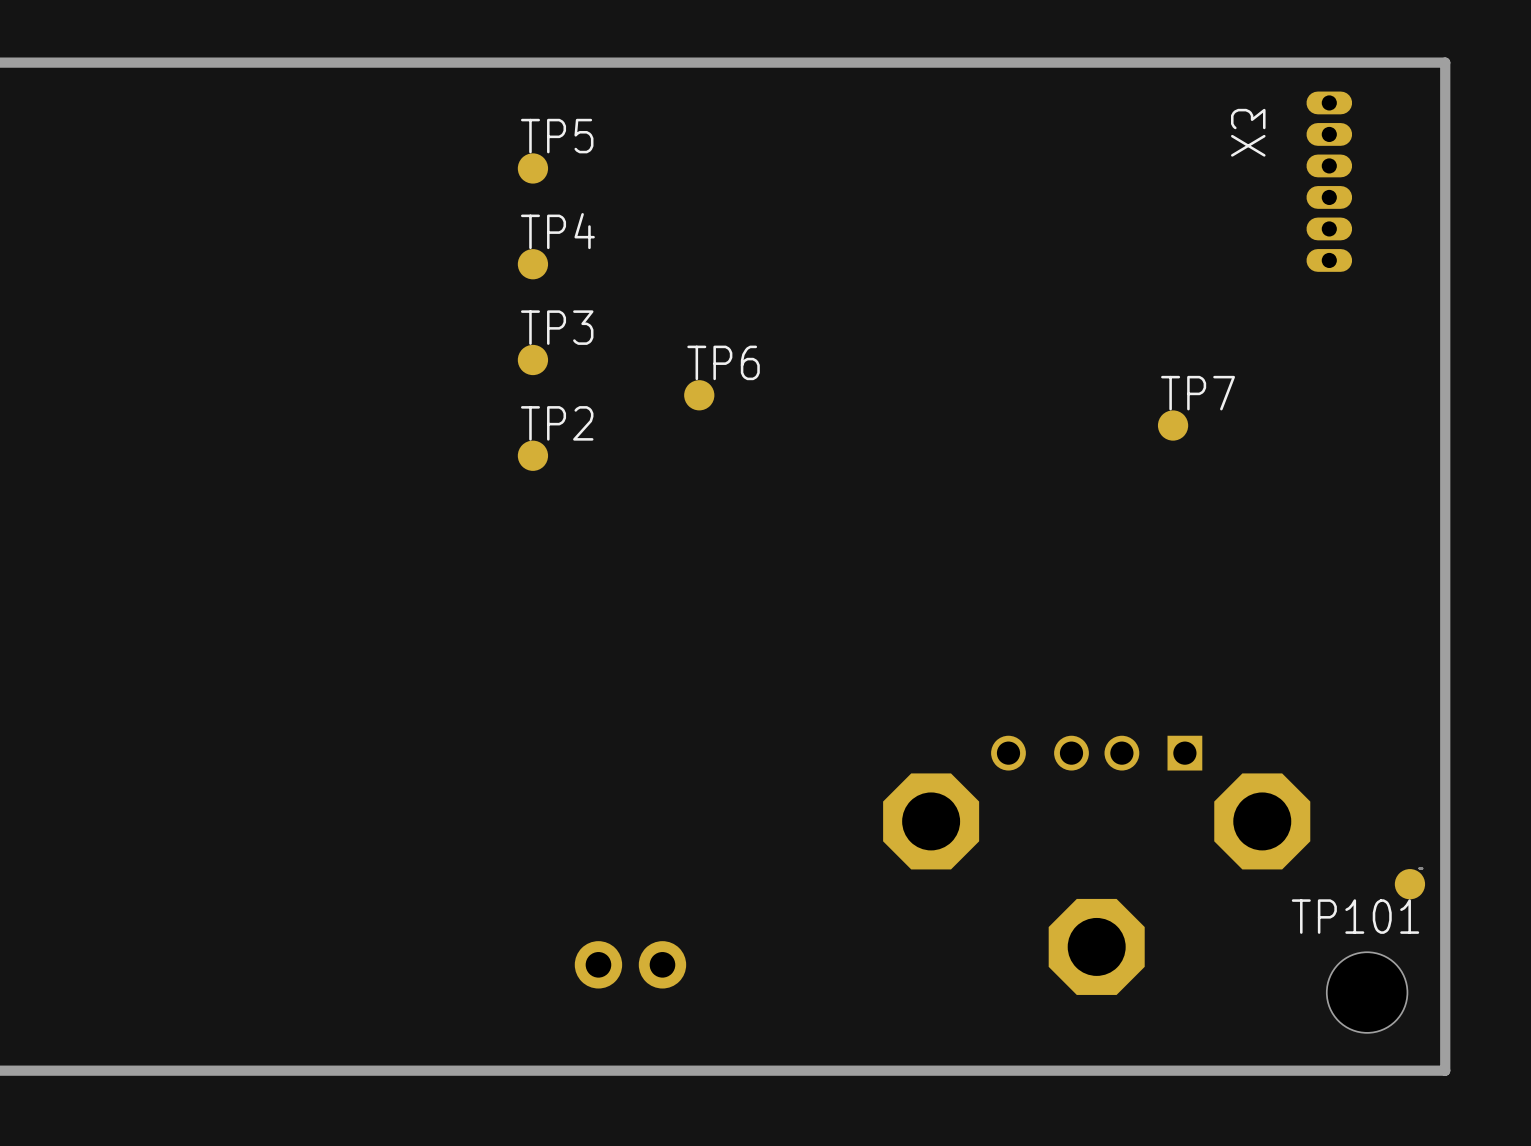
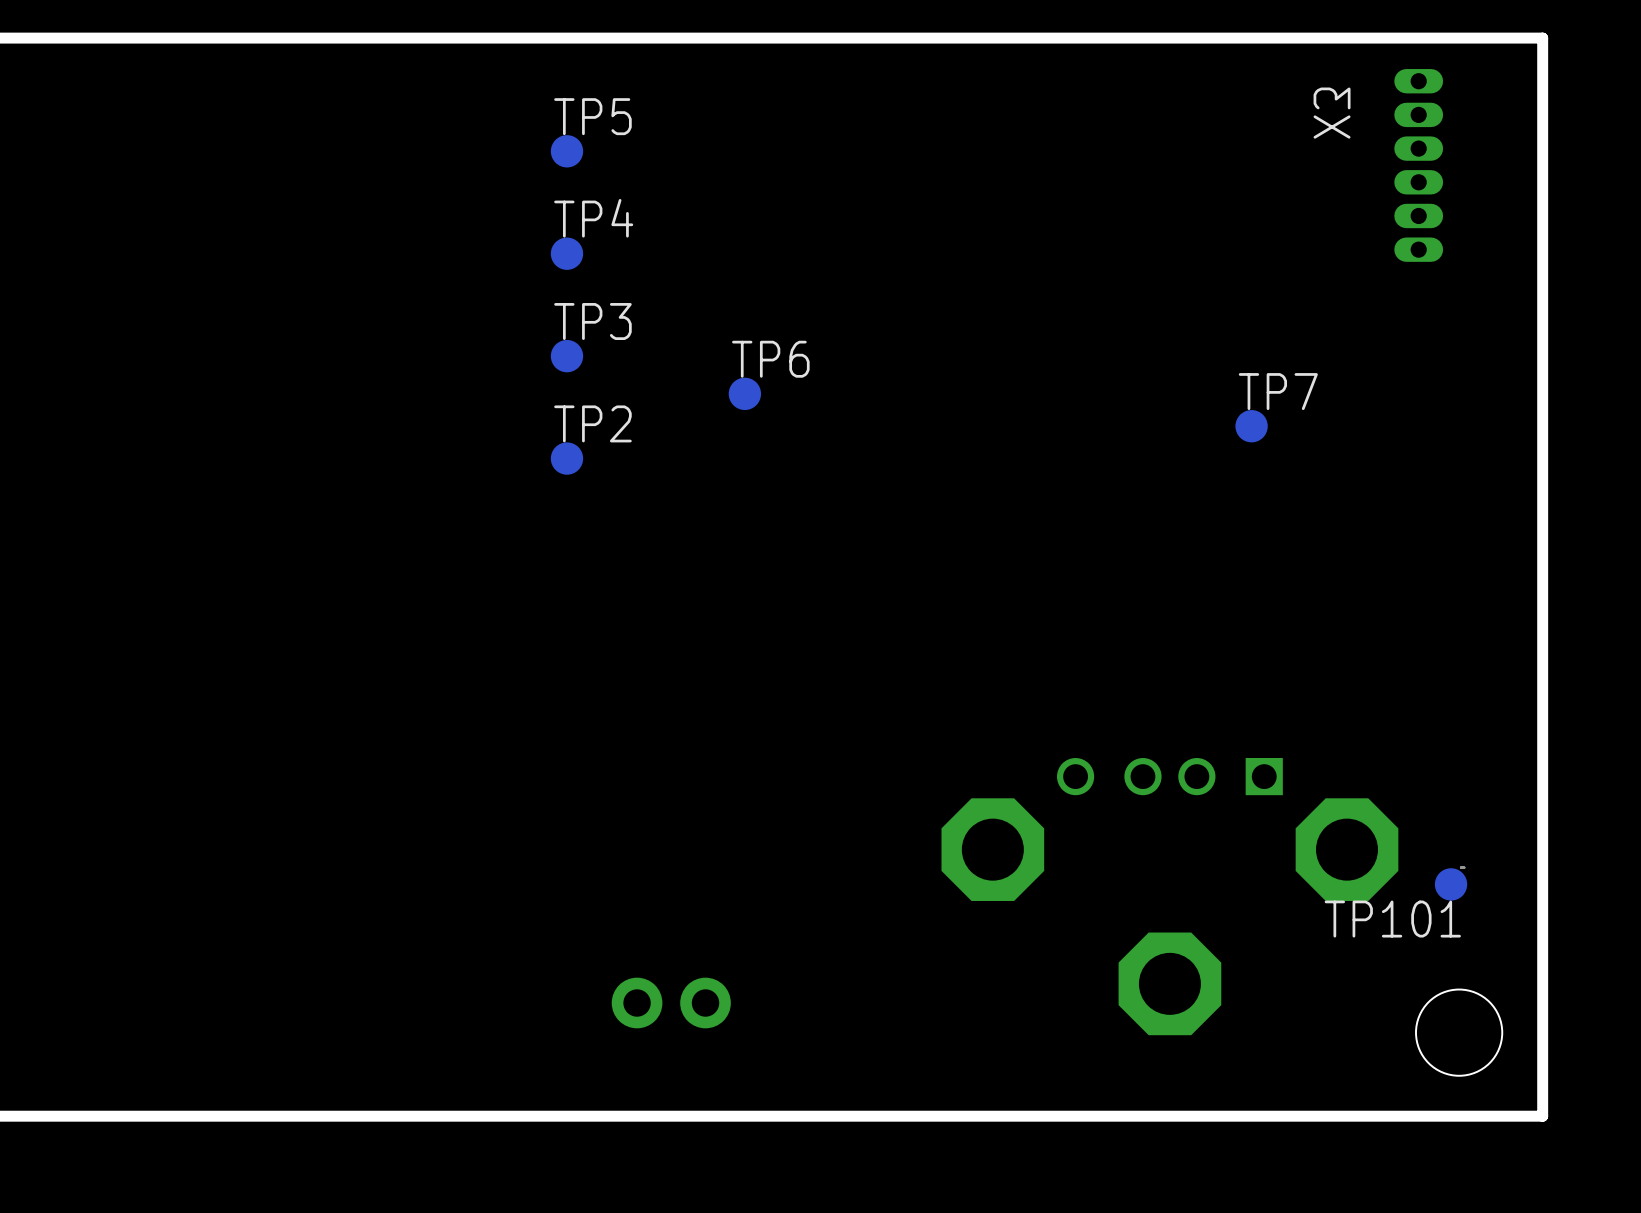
TP101 position: (1409, 884) -> (1451, 884)

